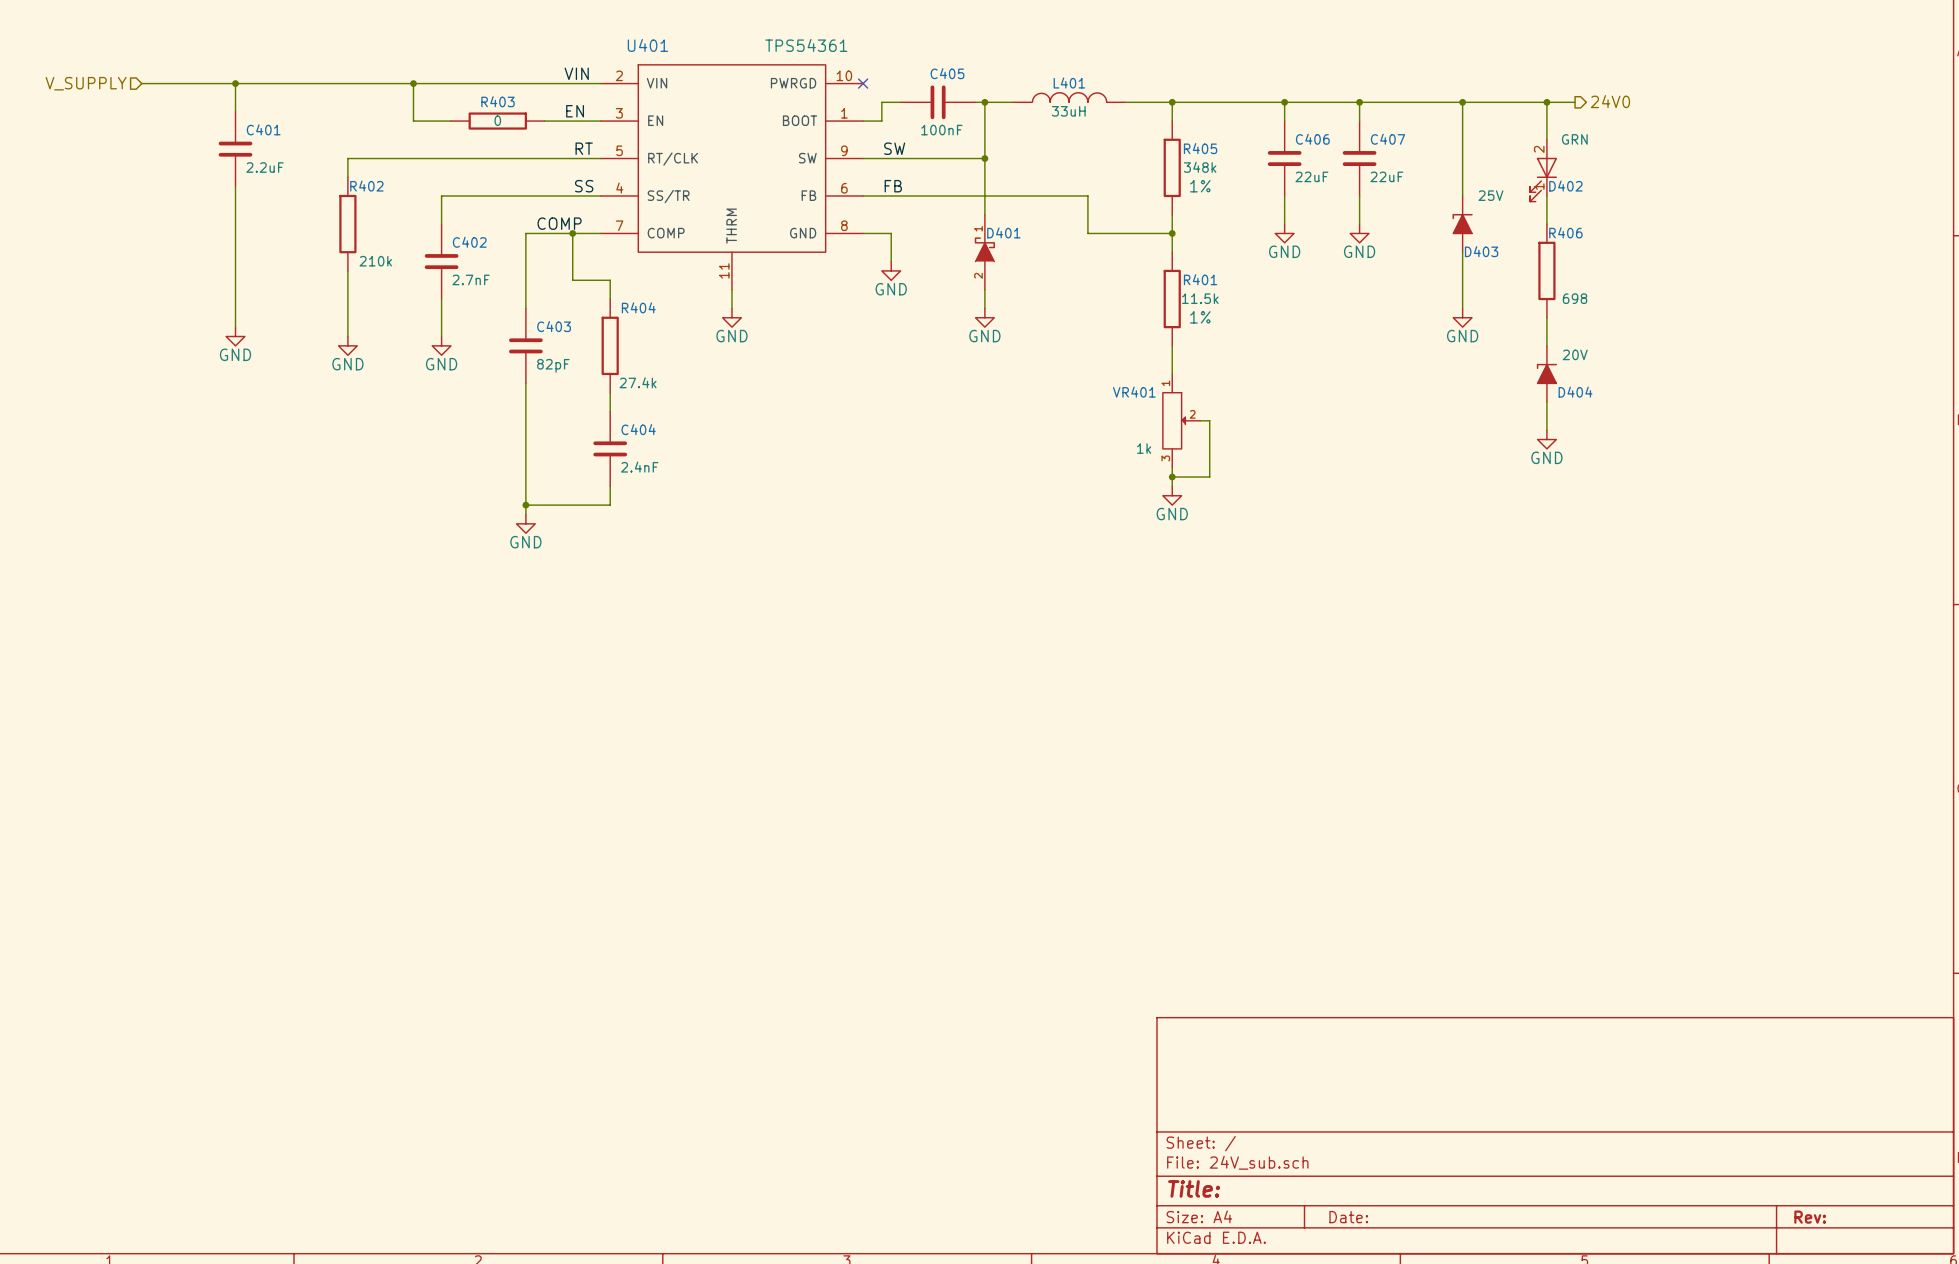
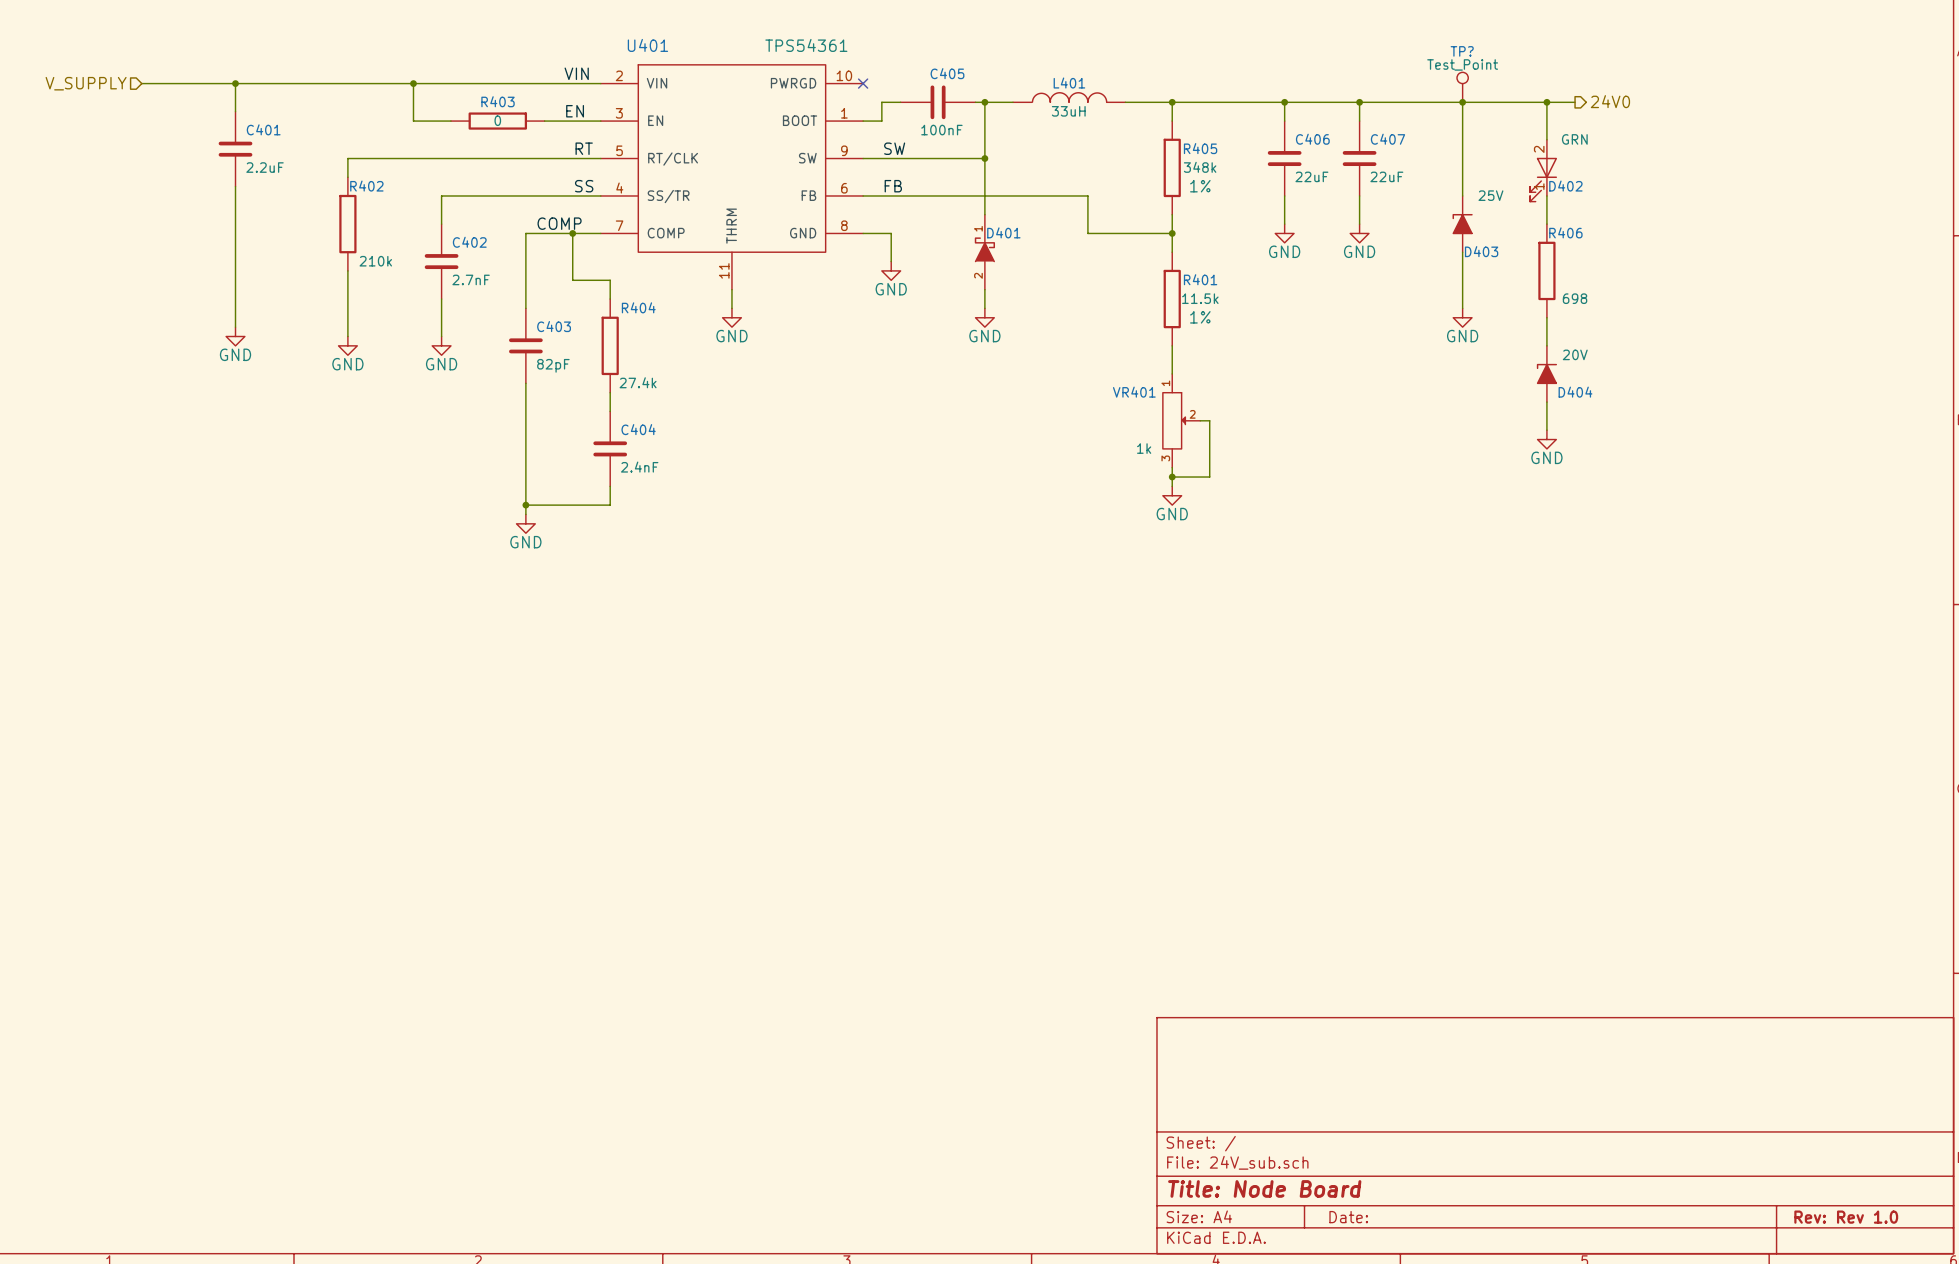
TP?: none -> Test_Point (1462, 87)
title block: Title: (1194, 1188) -> Title: Node Board (1264, 1188)
title block: Rev: (1810, 1217) -> Rev: Rev 1.0 (1846, 1217)

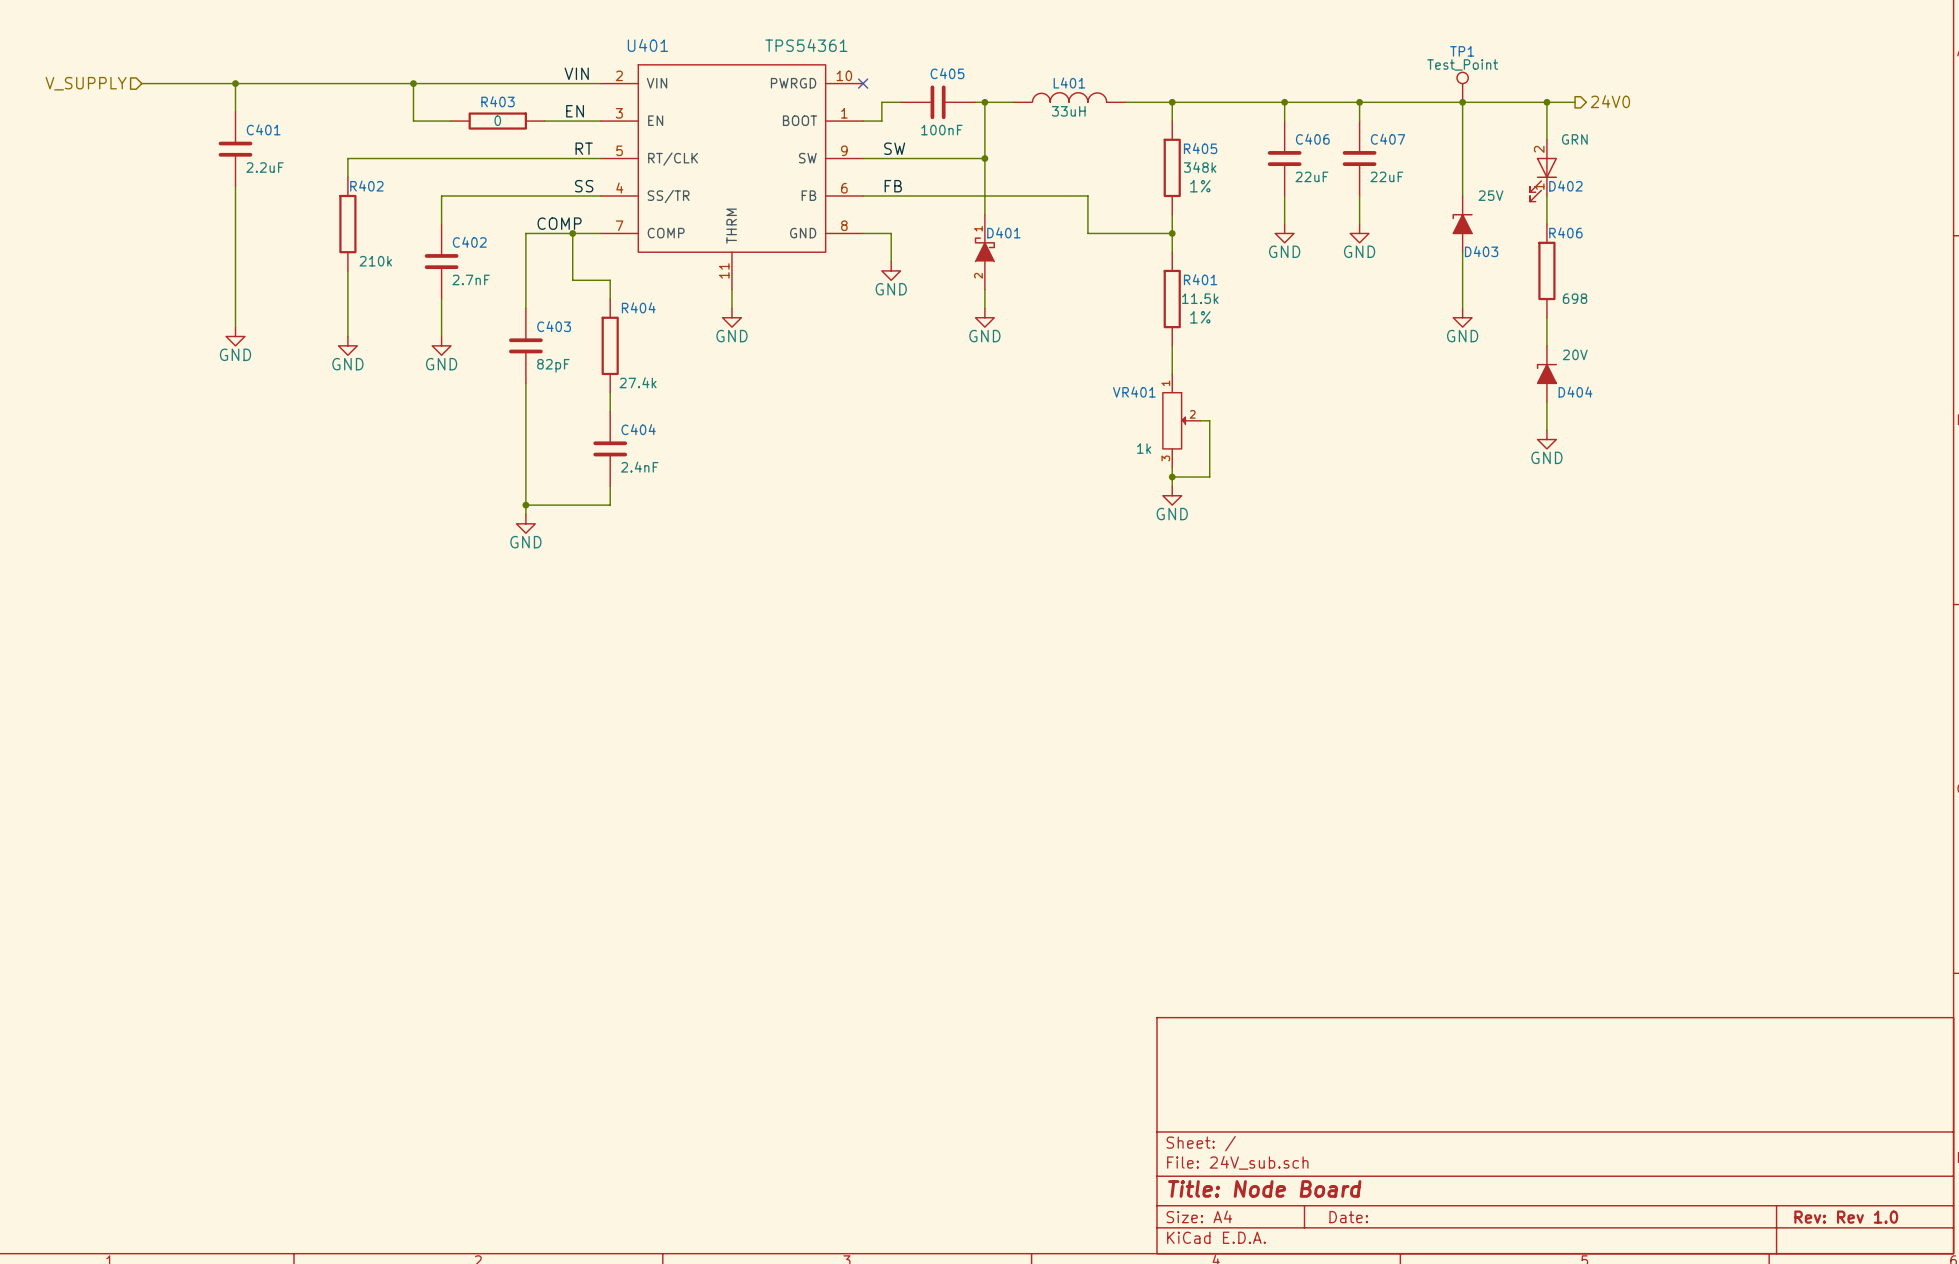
TP? name: TP? (1462, 51) -> TP1 (1462, 51)

